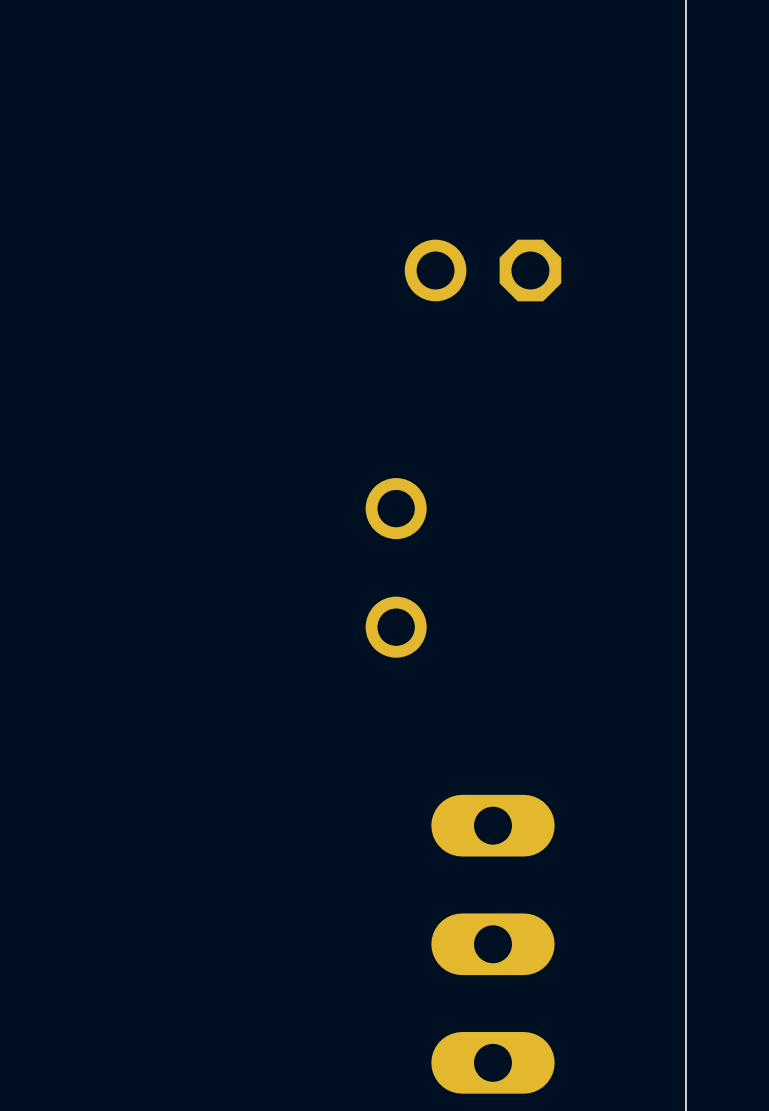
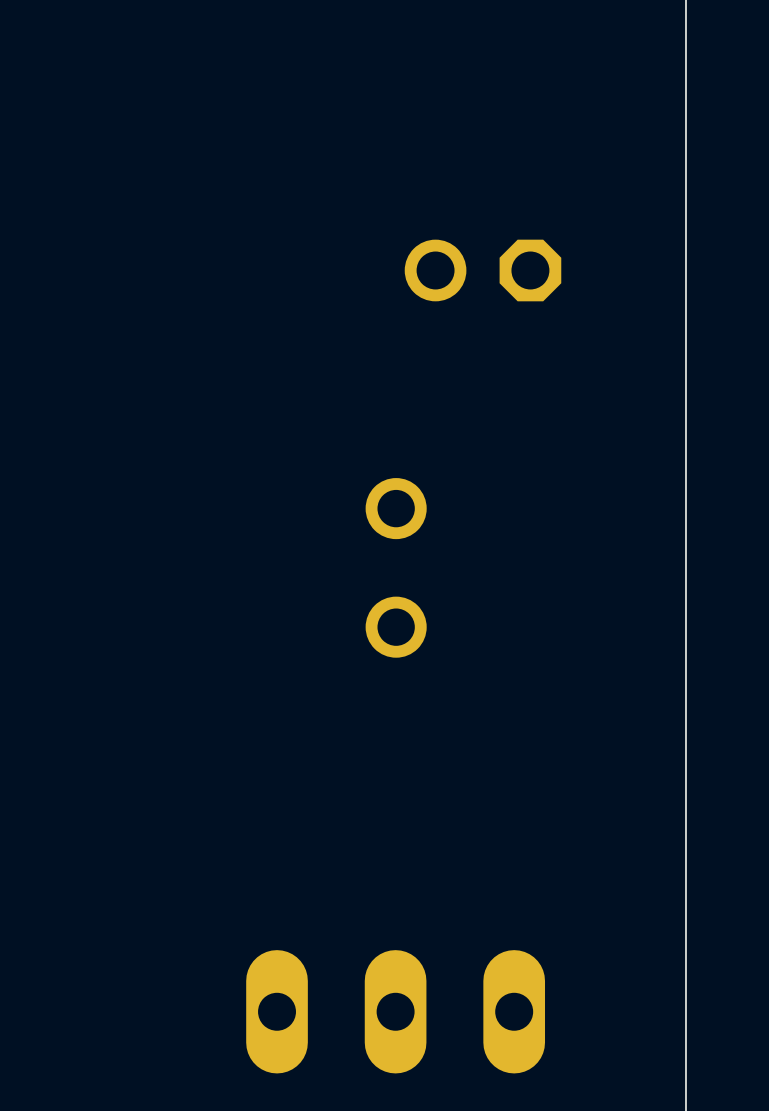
part rotation: 0° (492, 944) -> 90° clockwise (395, 1011)

